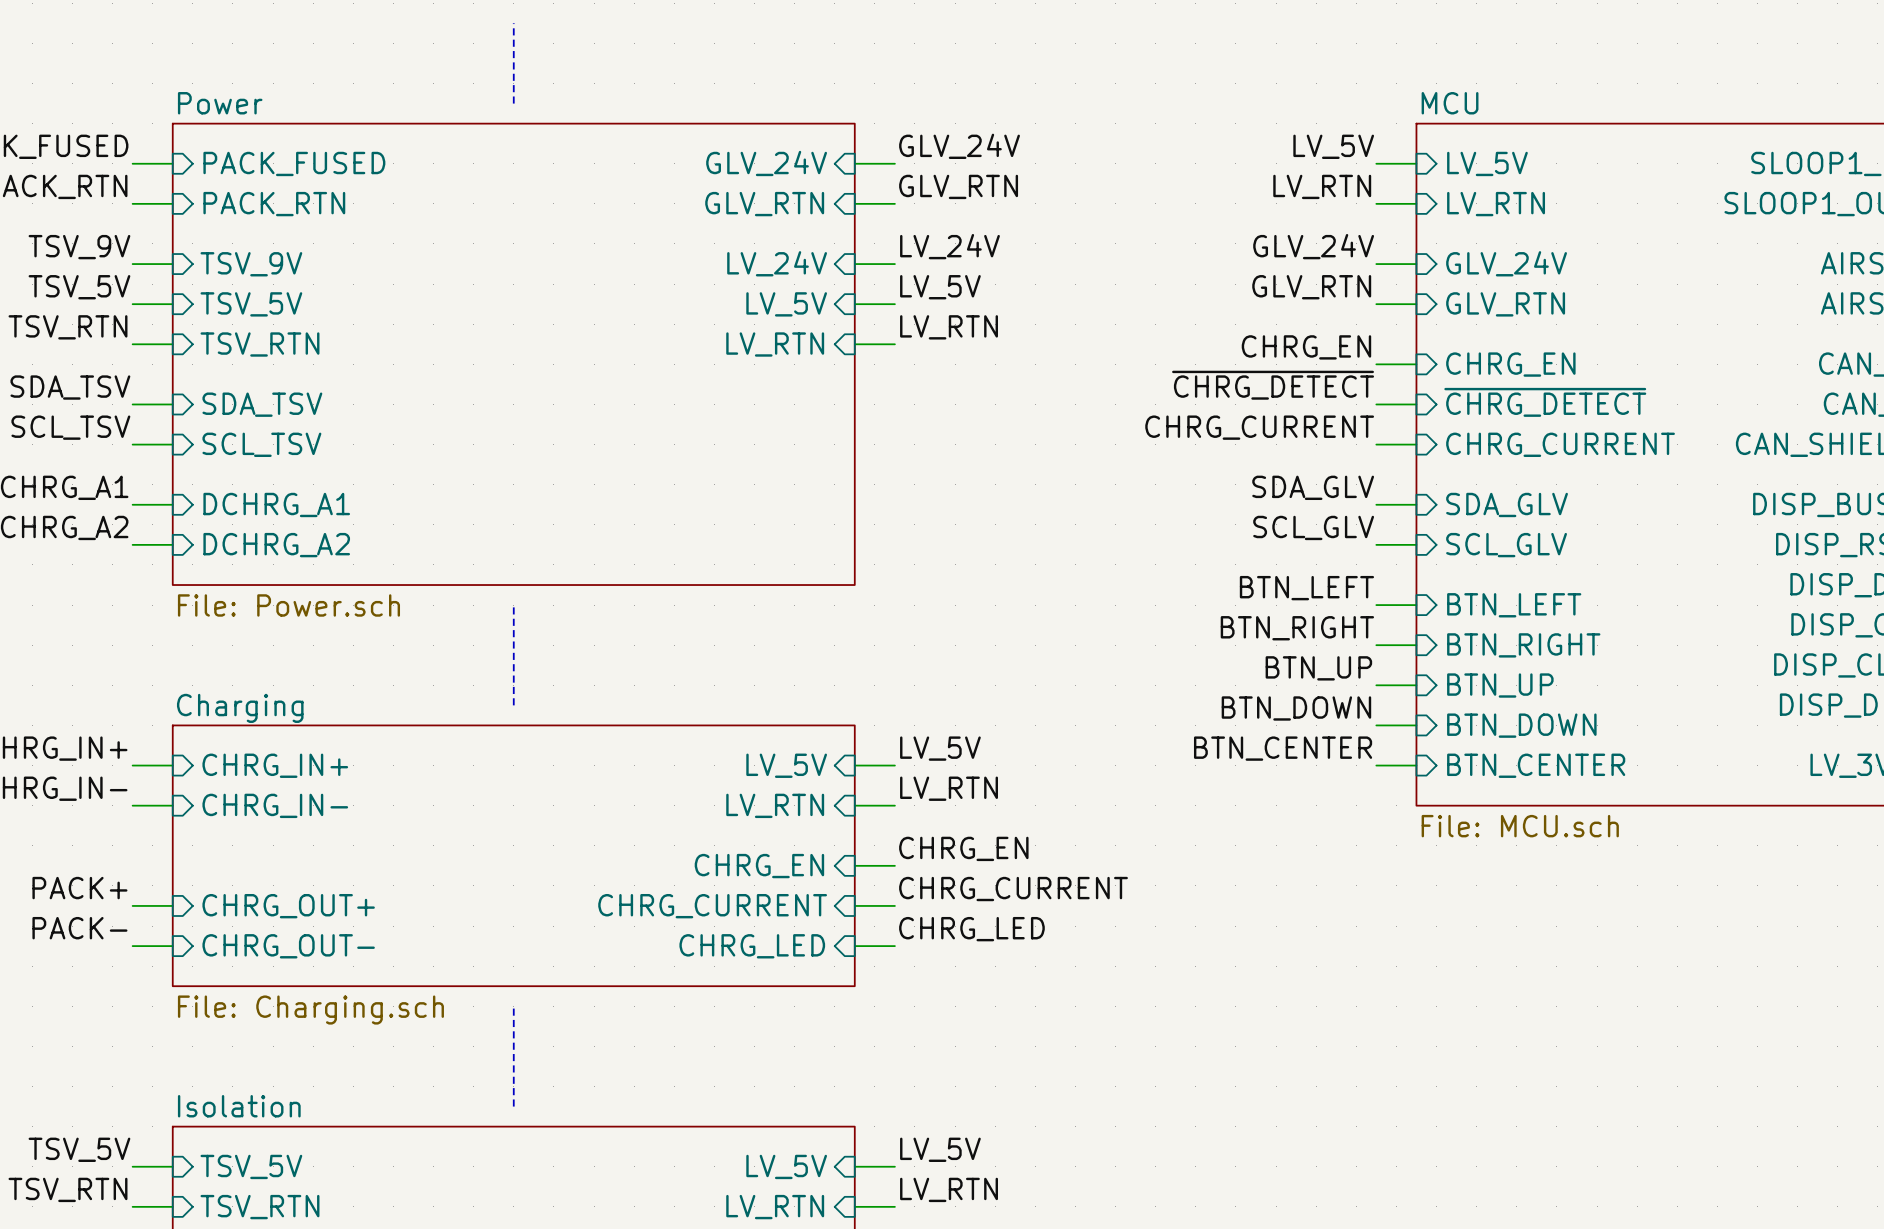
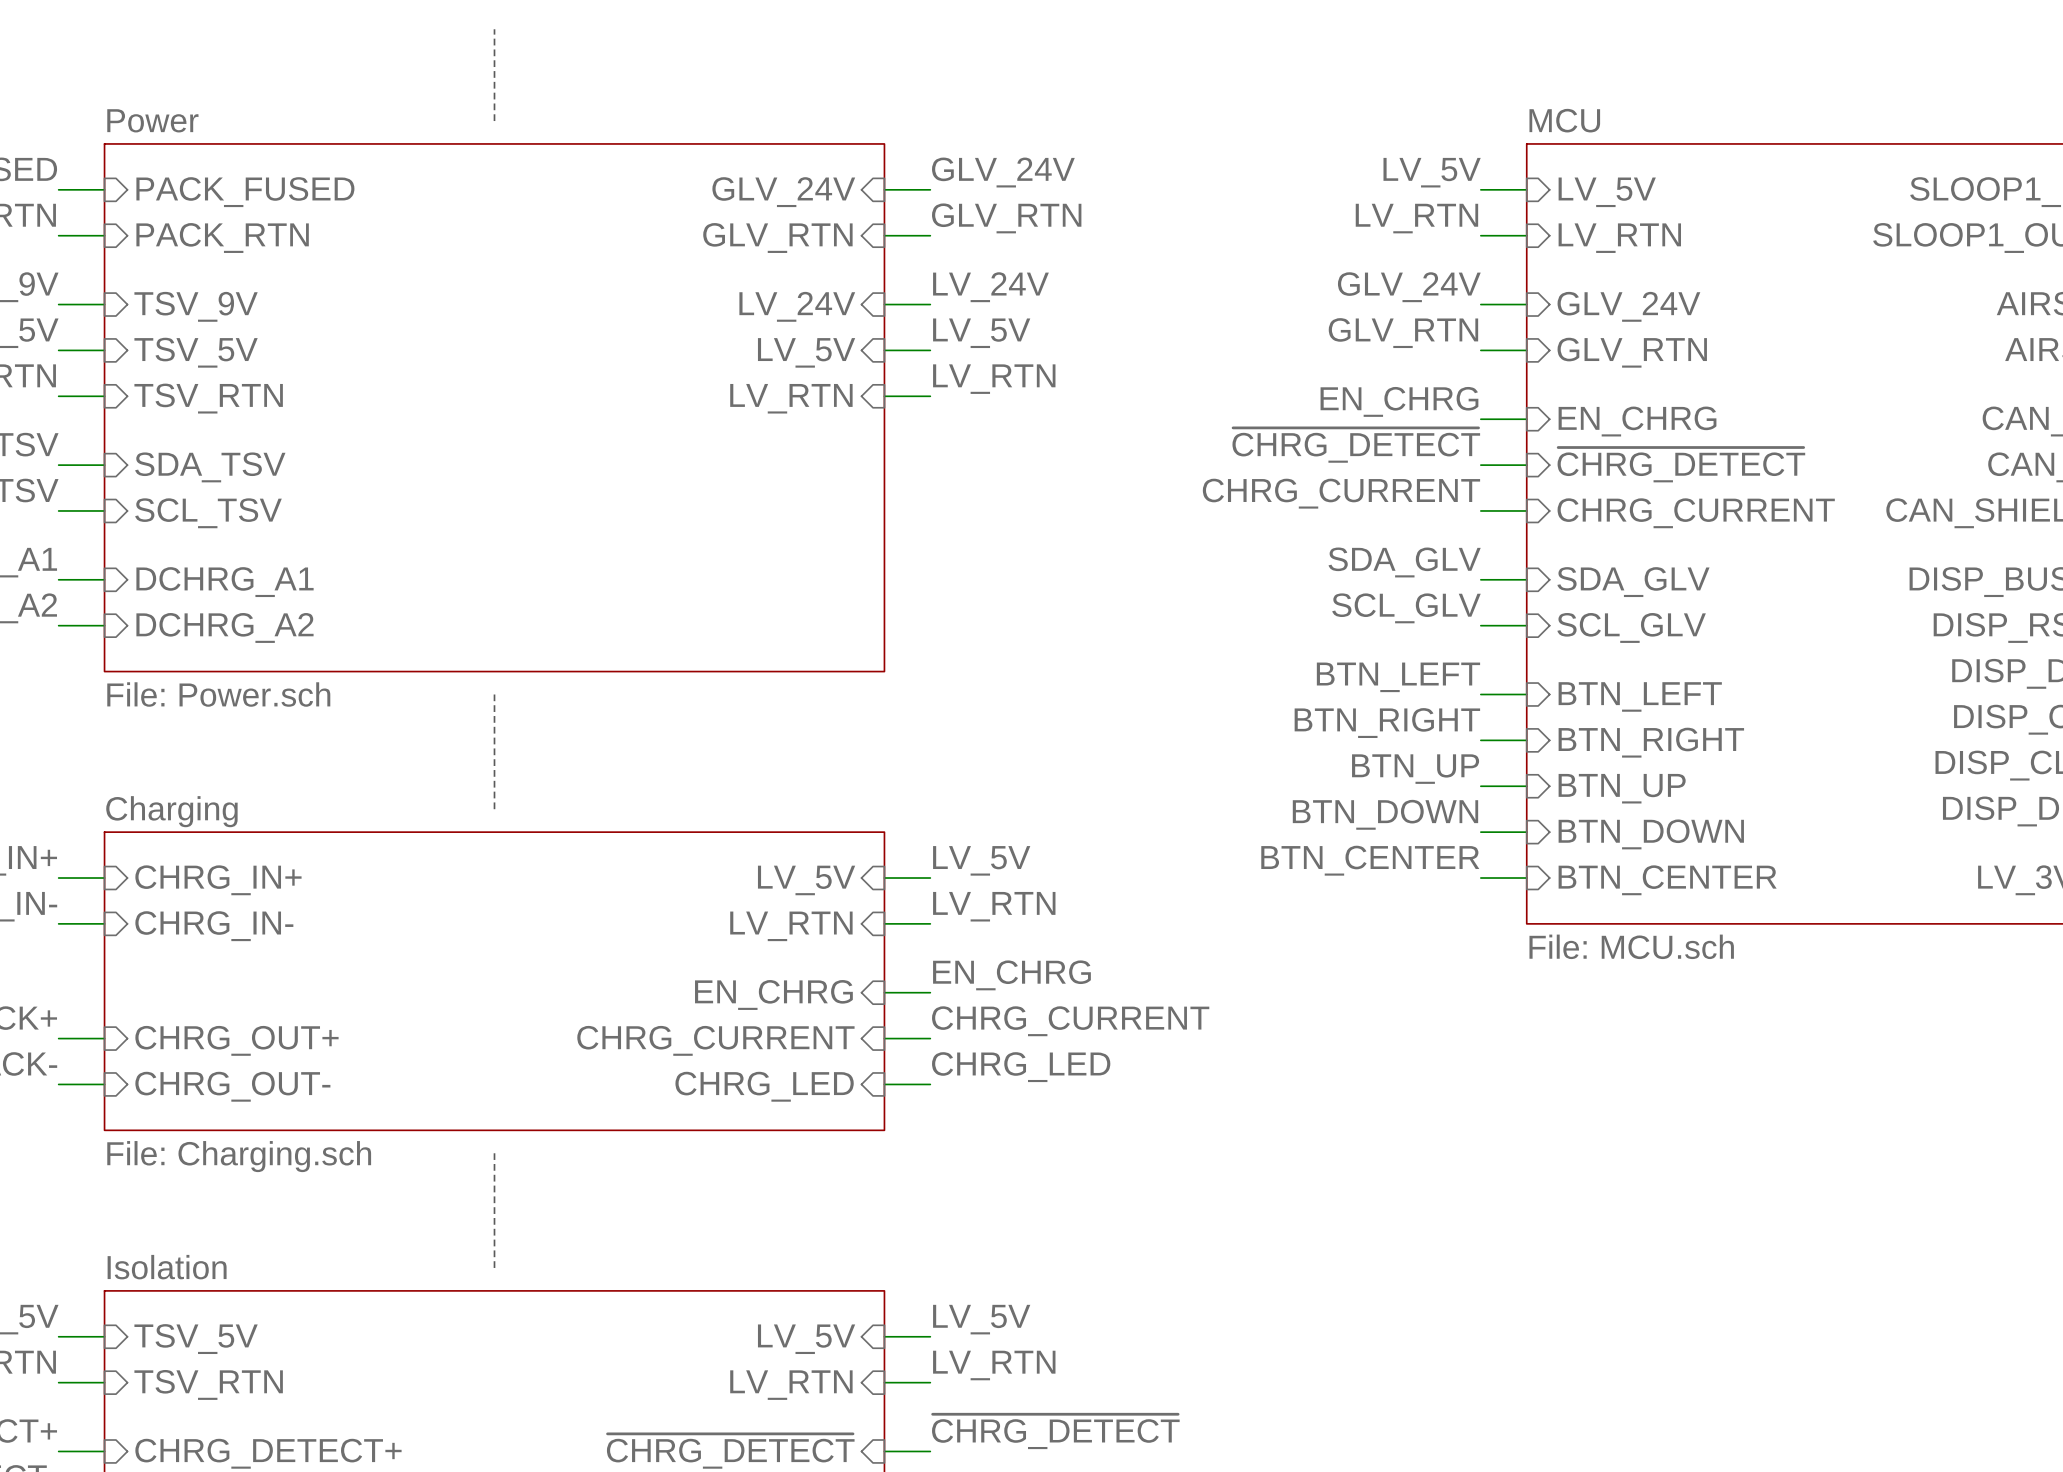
label: CHRG_EN (1306, 347) -> EN_CHRG (1399, 401)
sheet pin: CHRG_EN (1510, 364) -> EN_CHRG (1637, 421)
label: CHRG_EN (963, 848) -> EN_CHRG (1011, 975)
sheet pin: CHRG_EN (759, 866) -> EN_CHRG (773, 994)

